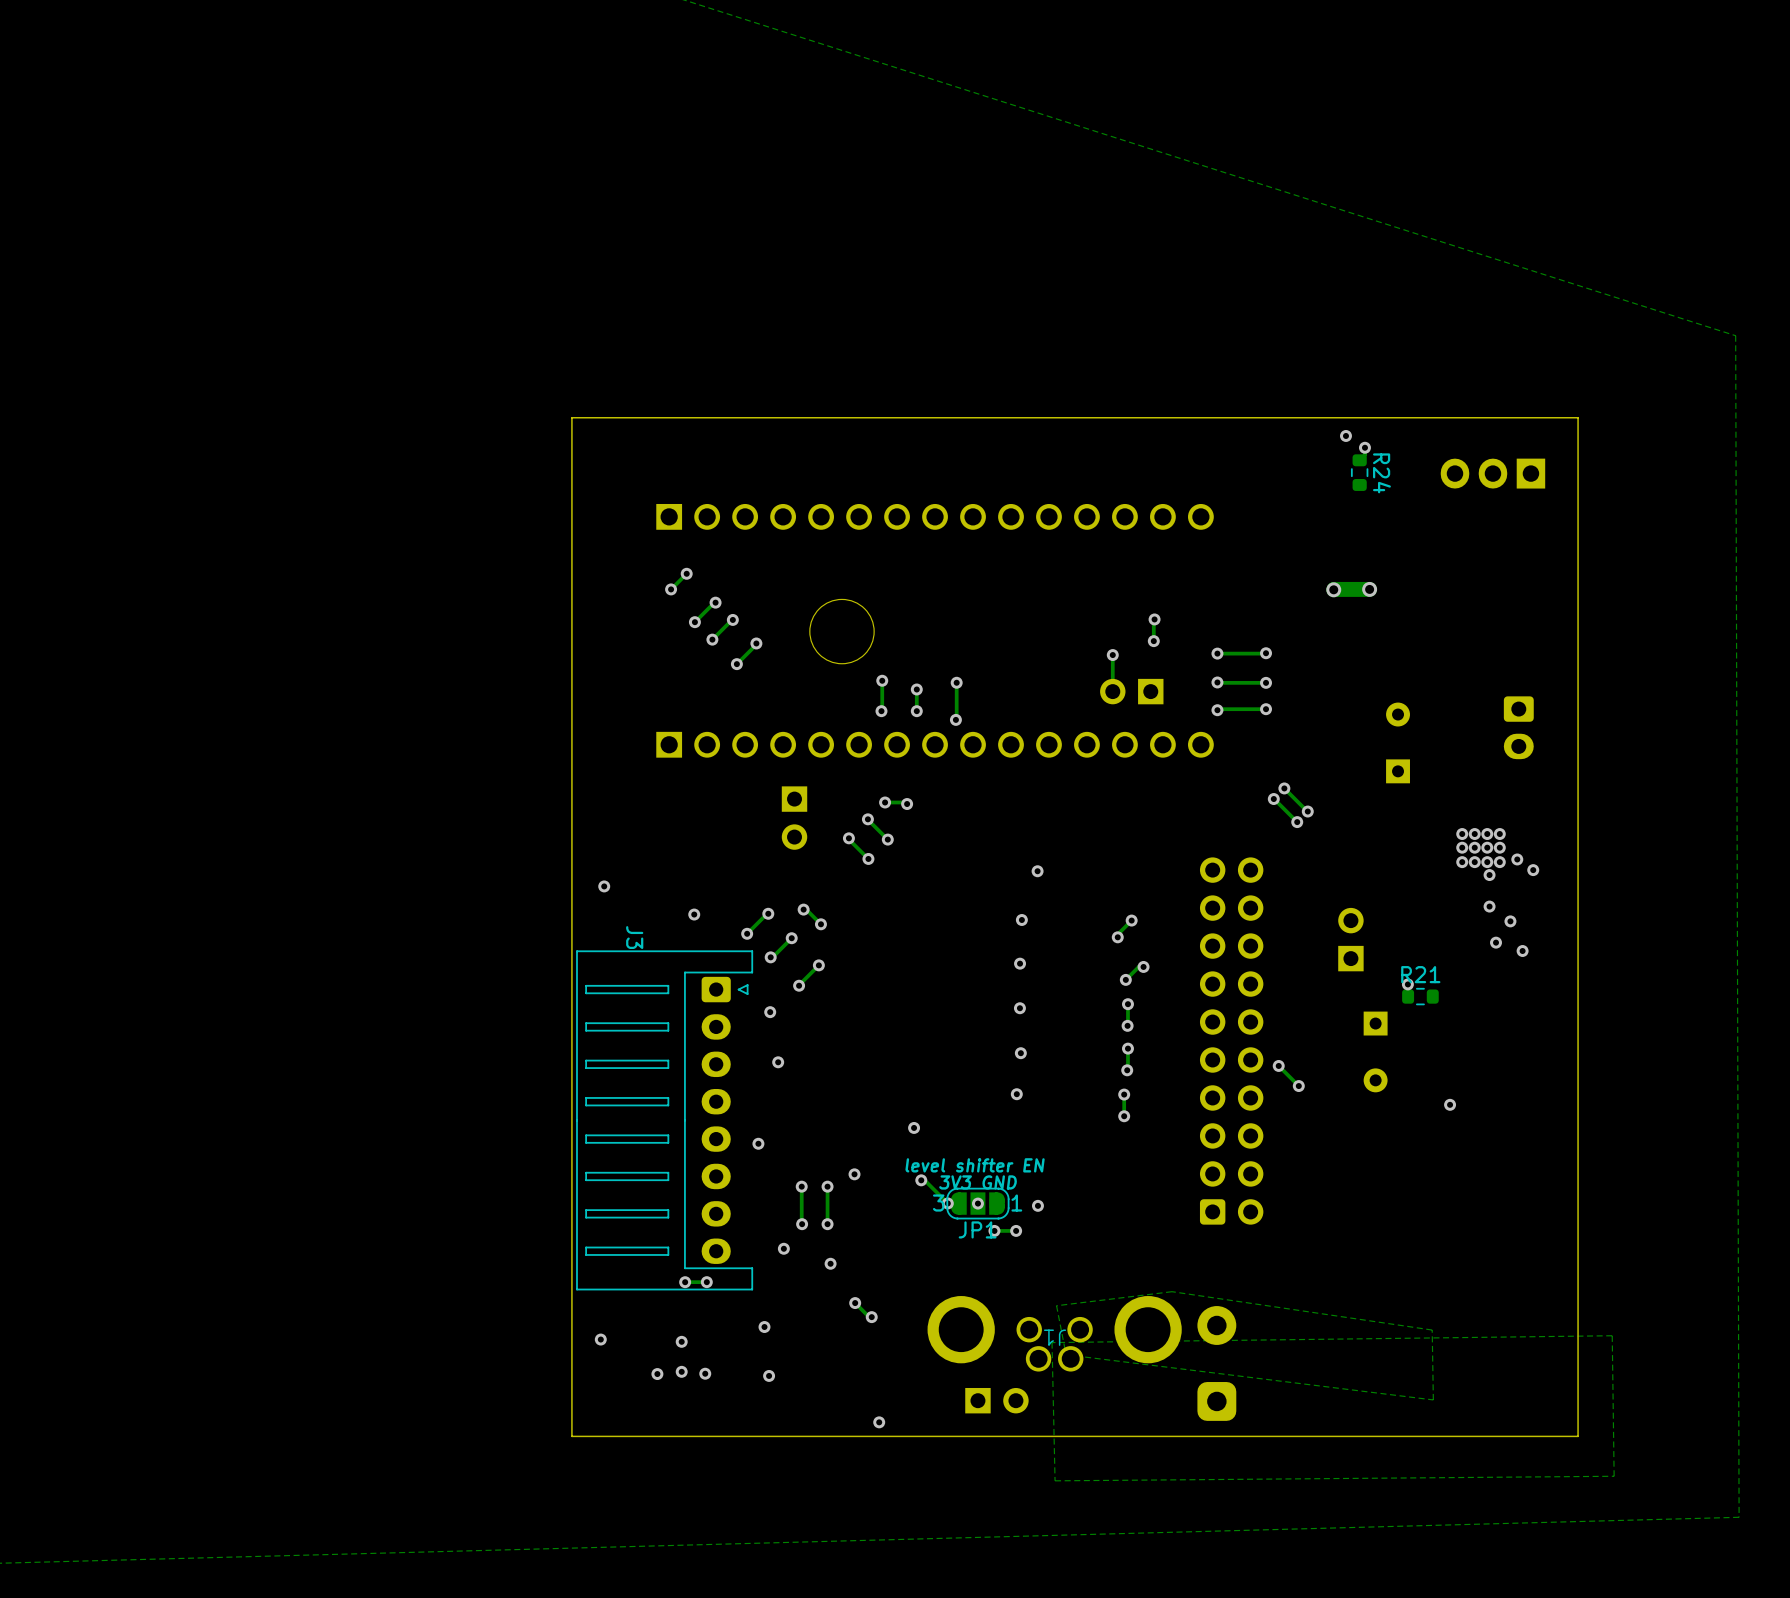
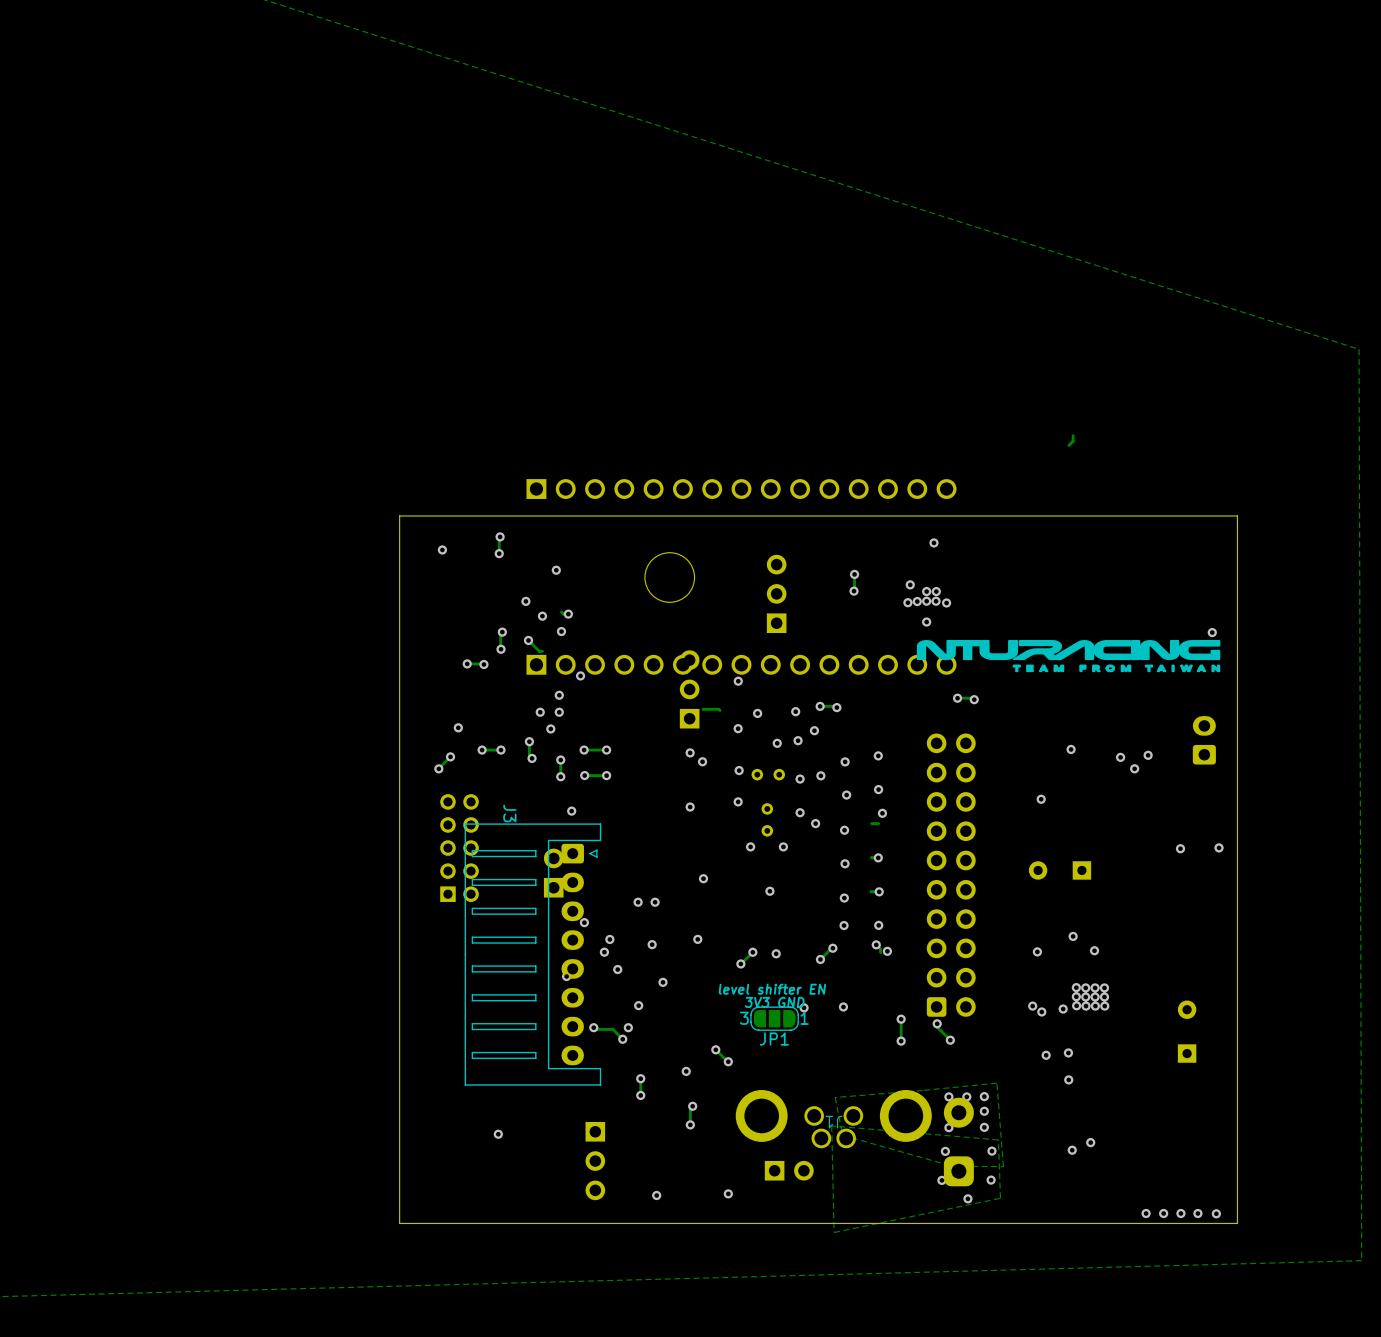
via: (1345, 435) -> none
via: (1364, 447) -> none
R24: (1359, 472) -> none
part: (1492, 473) -> none
board edge: (1578, 551) (1578, 417) (571, 417) (571, 1436) (1578, 1436) -> (1237, 515) (399, 515) (399, 1223) (1237, 1223) (1237, 1198)
track: (686, 573) (671, 589) -> none
via: (686, 573) -> none
track: none -> (500, 536) (499, 553)
via: none -> (500, 536)
via: none -> (933, 542)
via: (671, 589) -> none
via: (1333, 589) -> none
track: (1369, 589) (1333, 589) -> none
via: (1369, 589) -> none
via: none -> (442, 549)
via: none -> (499, 553)
track: (715, 602) (694, 622) -> none
via: (715, 602) -> none
track: (732, 619) (712, 639) -> none
via: (732, 619) -> none
track: (1154, 619) (1153, 641) -> none
via: (1154, 619) -> none
track: none -> (854, 574) (854, 591)
via: none -> (854, 574)
via: (712, 639) -> none
track: (756, 643) (736, 664) -> none
via: (756, 643) -> none
via: none -> (854, 591)
via: none -> (926, 591)
via: none -> (936, 591)
part: none -> (776, 593)
via: (1217, 653) -> none
track: (1266, 653) (1217, 653) -> none
via: (1266, 653) -> none
track: (1112, 655) (1112, 691) -> none
via: (1112, 655) -> none
via: none -> (525, 601)
via: none -> (917, 601)
via: none -> (926, 601)
via: none -> (936, 601)
via: (736, 664) -> none
via: none -> (907, 602)
via: none -> (946, 602)
track: none -> (561, 612) (568, 614)
via: none -> (568, 614)
track: (882, 680) (881, 711) -> none
via: (882, 680) -> none
via: none -> (542, 616)
track: (956, 682) (955, 719) -> none
via: (956, 682) -> none
track: (1217, 682) (1266, 682) -> none
via: (1217, 682) -> none
via: (1266, 682) -> none
track: (916, 689) (916, 711) -> (560, 760) (560, 776)
via: (916, 689) -> none
via: none -> (926, 622)
part: (1131, 691) -> none
via: none -> (561, 631)
track: none -> (502, 632) (500, 633) (501, 649)
via: none -> (502, 632)
via: none -> (1212, 632)
track: (1266, 709) (1217, 710) -> none
via: (1266, 709) -> none
via: (1217, 710) -> none
via: (881, 711) -> none
via: (916, 711) -> none
drawing: none -> [916, 639, 1221, 673]
track: none -> (528, 640) (539, 651) (542, 651)
via: none -> (528, 640)
via: (955, 719) -> none
via: none -> (501, 649)
part rotation: 0° (1518, 727) -> 180° (1204, 740)
part position: (1518, 727) -> (1204, 740)
part: (1398, 742) -> none
track: none -> (467, 663) (483, 664)
via: none -> (467, 663)
via: none -> (483, 664)
via: none -> (580, 675)
via: none -> (738, 681)
part: none -> (689, 689)
via: none -> (559, 695)
track: none -> (957, 698) (974, 699)
via: none -> (957, 698)
track: (1284, 788) (1307, 811) -> none
via: (1284, 788) -> none
via: none -> (974, 699)
track: none -> (820, 706) (836, 707)
via: none -> (820, 706)
track: (1273, 799) (1297, 822) -> none
via: (1273, 799) -> none
via: none -> (836, 707)
via: (885, 802) -> none
via: (907, 804) -> none
via: none -> (795, 711)
via: none -> (540, 712)
via: none -> (559, 712)
via: none -> (757, 713)
via: (1307, 811) -> none
part rotation: 0° (794, 818) -> 180° (553, 873)
part position: (794, 818) -> (553, 873)
track: (867, 819) (887, 839) -> none
via: (867, 819) -> none
via: (1297, 822) -> none
via: none -> (458, 727)
via: none -> (550, 728)
via: none -> (738, 728)
via: none -> (814, 730)
via: (1462, 834) -> none
via: (1474, 834) -> none
via: (1487, 834) -> none
via: (1499, 834) -> none
track: (848, 838) (868, 858) -> none
via: (848, 838) -> none
via: (887, 839) -> none
via: none -> (798, 740)
track: none -> (529, 741) (529, 755) (532, 758)
via: none -> (529, 741)
via: none -> (777, 743)
via: (1462, 847) -> none
via: (1474, 847) -> none
via: (1487, 847) -> none
via: (1499, 847) -> none
via: none -> (1071, 749)
via: none -> (482, 750)
track: none -> (501, 750) (482, 750)
via: none -> (501, 750)
via: none -> (584, 750)
track: none -> (606, 750) (584, 750)
via: none -> (606, 750)
via: (1517, 859) -> none
via: none -> (878, 755)
via: (1474, 862) -> none
via: (1487, 862) -> none
via: (1499, 862) -> none
track: none -> (450, 756) (438, 768)
via: none -> (450, 756)
via: none -> (1120, 757)
via: none -> (532, 758)
via: none -> (560, 760)
via: none -> (702, 761)
via: none -> (845, 761)
via: (1533, 870) -> none
via: (1037, 871) -> none
via: (1489, 875) -> none
via: none -> (438, 768)
via: none -> (1134, 768)
via: none -> (739, 770)
via: (604, 886) -> none
part: none -> (768, 774)
via: none -> (584, 775)
track: none -> (606, 775) (584, 775)
via: none -> (606, 775)
via: none -> (820, 775)
via: none -> (560, 776)
via: none -> (800, 779)
via: (1489, 906) -> none
track: (803, 909) (806, 909) (820, 924) -> none
via: (803, 909) -> none
track: (768, 913) (747, 933) -> none
via: (768, 913) -> none
via: none -> (846, 795)
via: (694, 914) -> none
via: (1021, 919) -> none
via: none -> (1041, 799)
track: (1131, 920) (1117, 934) (1117, 937) -> none
via position: (1131, 920) -> (878, 789)
via: (1510, 921) -> none
via: none -> (738, 801)
via: (820, 924) -> none
via: none -> (690, 807)
via: (747, 933) -> none
via: none -> (571, 811)
via: none -> (800, 812)
track: (791, 938) (770, 957) -> none
via: (791, 938) -> none
part: (1350, 939) -> none
via: (1496, 942) -> none
part: none -> (767, 819)
via: none -> (815, 823)
track: none -> (878, 823) (871, 823)
via: (1522, 951) -> none
via: (770, 957) -> none
via: none -> (844, 830)
via: (1020, 963) -> none
track: (818, 965) (799, 985) -> none
via: (818, 965) -> none
track: (1143, 966) (1138, 966) (1125, 979) -> none
via: (1143, 966) -> none
via: (1125, 979) -> none
via: none -> (750, 846)
via: none -> (783, 846)
part: none -> (459, 848)
via: none -> (1219, 847)
via: none -> (1180, 848)
via: (1407, 984) -> none
via: (799, 985) -> none
track: none -> (871, 857) (878, 857)
via: none -> (878, 857)
R21: (1420, 996) -> none
via: none -> (845, 863)
track: (1127, 1004) (1127, 1025) -> none
via: (1127, 1004) -> none
via: (1019, 1008) -> none
via: (770, 1012) -> none
via: none -> (703, 878)
via: (1127, 1025) -> none
via: none -> (769, 891)
track: none -> (871, 891) (879, 891)
via: none -> (879, 891)
part position: (1231, 1041) -> (951, 875)
via: none -> (844, 898)
track: (1127, 1048) (1127, 1070) -> none
via: (1127, 1048) -> none
part rotation: 0° (1375, 1051) -> 90° clockwise (1060, 870)
part position: (1375, 1051) -> (1060, 870)
via: none -> (638, 902)
via: none -> (655, 902)
via: (1020, 1053) -> none
via: (778, 1062) -> none
track: (1278, 1065) (1298, 1086) -> none
via: (1278, 1065) -> none
via: (1127, 1070) -> none
via: none -> (584, 922)
via: none -> (844, 925)
via: none -> (878, 925)
via: (1298, 1086) -> none
via: (1016, 1094) -> none
track: (1124, 1094) (1124, 1116) -> (690, 1108) (690, 1124)
via: (1124, 1094) -> none
via: none -> (1073, 936)
via: none -> (609, 939)
via: none -> (697, 939)
via: (1450, 1104) -> none
via: none -> (652, 944)
track: none -> (876, 944) (880, 949) (880, 952)
via: none -> (876, 944)
track: none -> (832, 948) (820, 959)
via: none -> (832, 948)
via: none -> (1094, 950)
via: none -> (1037, 951)
via: none -> (604, 952)
track: none -> (752, 952) (740, 963)
via: none -> (752, 952)
via: none -> (776, 953)
via: none -> (820, 959)
via: (914, 1127) -> none
via: none -> (740, 963)
via: none -> (617, 969)
via: (758, 1143) -> none
via: none -> (566, 976)
via: none -> (663, 982)
via: none -> (1076, 987)
via: none -> (1085, 987)
via: none -> (1095, 987)
via: none -> (1104, 987)
via: (854, 1174) -> none
via: none -> (1076, 996)
via: none -> (1085, 997)
via: none -> (1095, 997)
via: none -> (1104, 997)
track: (921, 1180) (924, 1180) (947, 1203) (958, 1203) -> none
via: (921, 1180) -> none
track: (801, 1186) (802, 1224) -> none
track: (827, 1186) (827, 1224) -> none
via: (827, 1186) -> none
via: none -> (1076, 1005)
via: none -> (1032, 1006)
via: none -> (1086, 1006)
via: none -> (1095, 1006)
via: none -> (1104, 1006)
via: none -> (843, 1006)
via: none -> (804, 1007)
via: none -> (1063, 1009)
via: none -> (1041, 1011)
via: (947, 1203) -> none
via: (977, 1203) -> none
track: none -> (901, 1019) (901, 1041)
via: none -> (901, 1019)
via: (1037, 1205) -> none
track: none -> (937, 1023) (937, 1027) (950, 1040)
via: none -> (937, 1023)
track: none -> (593, 1027) (595, 1029) (612, 1029) (622, 1039)
via: none -> (593, 1027)
via: none -> (628, 1027)
part: none -> (1187, 1031)
via: (802, 1224) -> none
via: (827, 1224) -> none
via: none -> (622, 1039)
via: (994, 1230) -> none
track: (1016, 1230) (994, 1230) -> none
via: (1016, 1230) -> none
via: none -> (950, 1040)
via: none -> (901, 1041)
track: none -> (715, 1049) (728, 1061)
via: none -> (715, 1049)
via: (783, 1248) -> none
via: none -> (1068, 1052)
via: none -> (1046, 1055)
via: none -> (728, 1061)
via: (830, 1263) -> none
via: none -> (686, 1071)
track: none -> (640, 1078) (640, 1095)
via: none -> (640, 1078)
via: (685, 1282) -> none
track: (706, 1282) (685, 1282) -> none
via: (706, 1282) -> none
via: none -> (1068, 1079)
via: none -> (640, 1095)
track: (855, 1303) (869, 1317) (871, 1317) -> none
via: (855, 1303) -> none
via: none -> (948, 1096)
via: none -> (966, 1096)
via: none -> (984, 1096)
zone outline: (1056, 1305) (1172, 1291) (1432, 1330) (1433, 1399) (1066, 1354) -> (835, 1097) (996, 1083) (1003, 1166) (952, 1166) (842, 1135)
via: none -> (984, 1111)
via: (764, 1327) -> none
via: (600, 1339) -> none
via: (681, 1341) -> none
via: none -> (690, 1124)
zone outline: (1052, 1342) (1612, 1335) (1614, 1476) (1055, 1480) -> (831, 1125) (998, 1139) (1000, 1198) (834, 1232)
via: none -> (948, 1127)
via: none -> (984, 1127)
via: none -> (498, 1134)
via: none -> (1090, 1142)
via: (681, 1371) -> none
via: (705, 1373) -> none
via: (657, 1374) -> none
via: none -> (1072, 1150)
via: (769, 1375) -> none
via: none -> (945, 1151)
via: none -> (991, 1151)
part: none -> (595, 1161)
via: none -> (991, 1180)
via: none -> (941, 1180)
via: (879, 1422) -> none
via: none -> (728, 1193)
via: none -> (656, 1195)
via: none -> (967, 1198)
via: none -> (1146, 1213)
via: none -> (1163, 1213)
via: none -> (1180, 1213)
via: none -> (1197, 1213)
via: none -> (1216, 1213)

